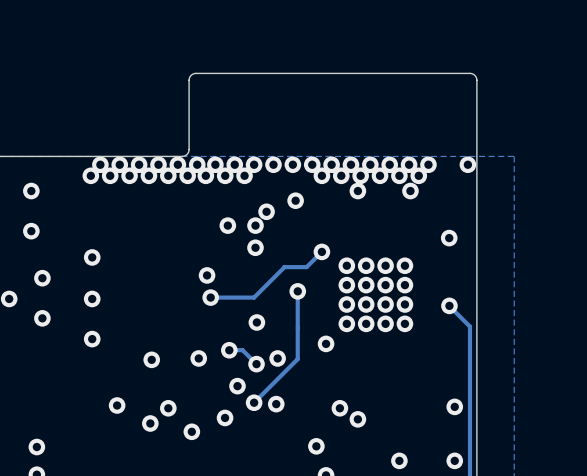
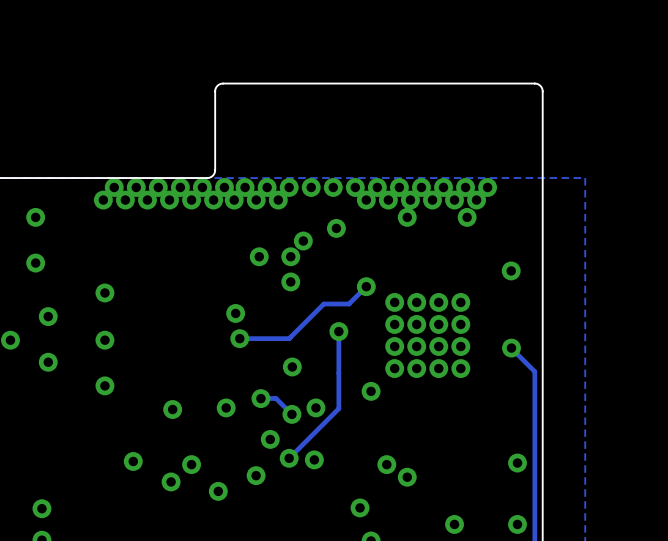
via: (467, 164) -> none

